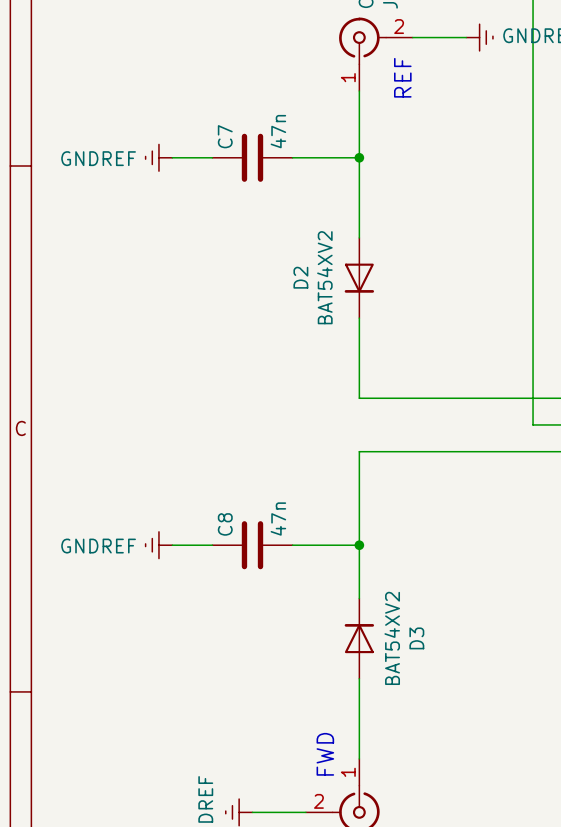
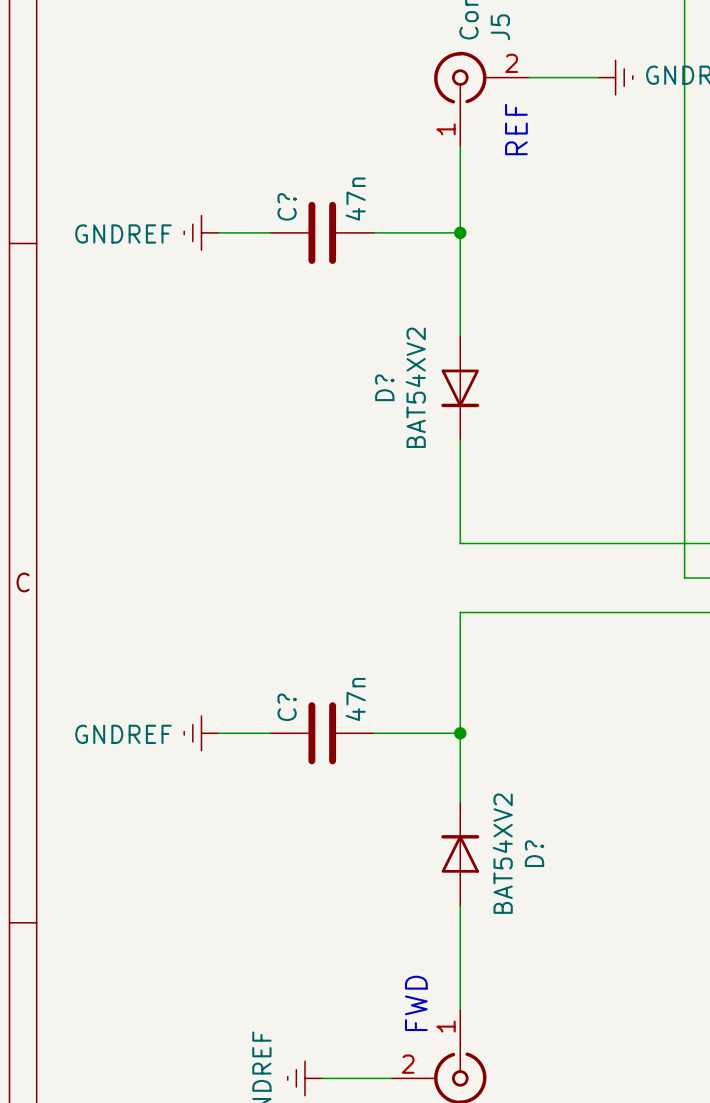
C7 name: C7 (225, 136) -> C? (287, 206)
D2 name: D2 (300, 277) -> D? (384, 387)
C8 name: C8 (225, 524) -> C? (287, 707)
D3 name: D3 (416, 638) -> D? (534, 853)

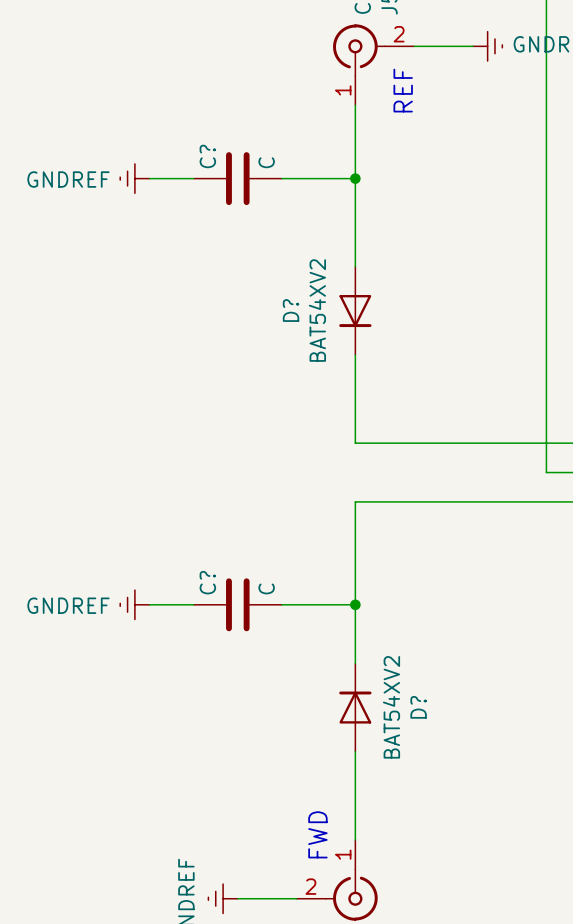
C? value: 47n (355, 199) -> C (266, 162)
C? value: 47n (355, 699) -> C (266, 588)

